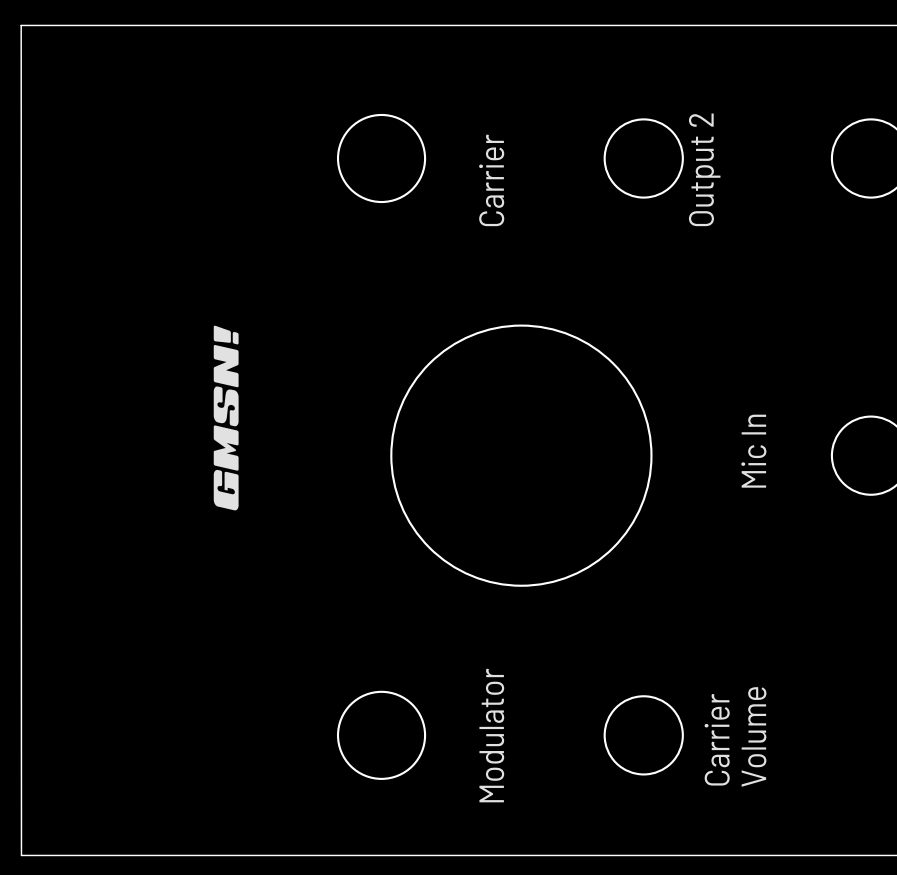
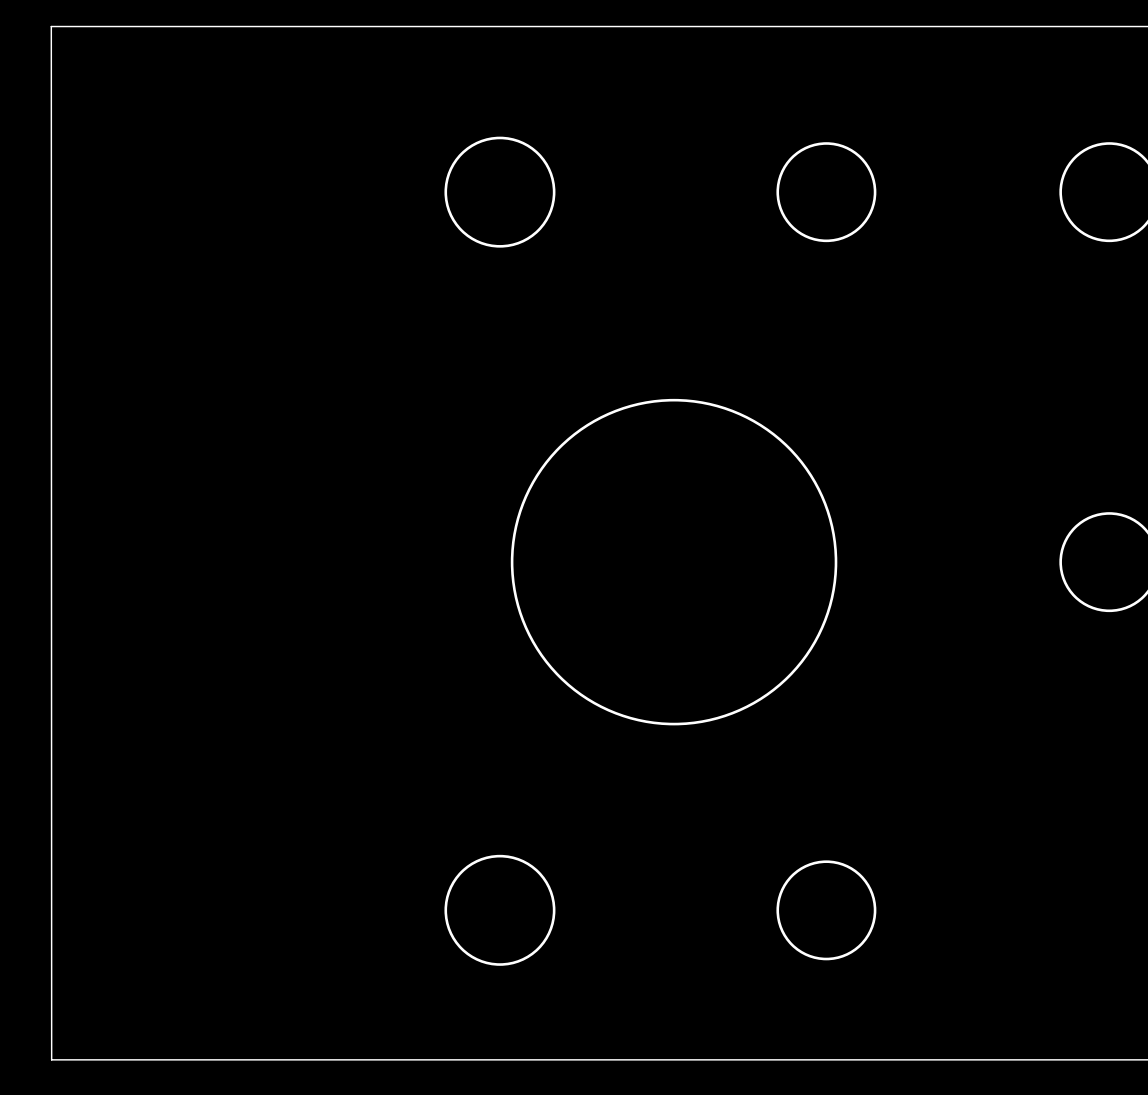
text: Output 2 (704, 169) -> none
text: Carrier (491, 180) -> none
drawing: [213, 325, 239, 511] -> none
text: Mic In (753, 451) -> none
text: Modulator (491, 735) -> none
text: Volume (754, 736) -> none
text: Carrier (717, 739) -> none

